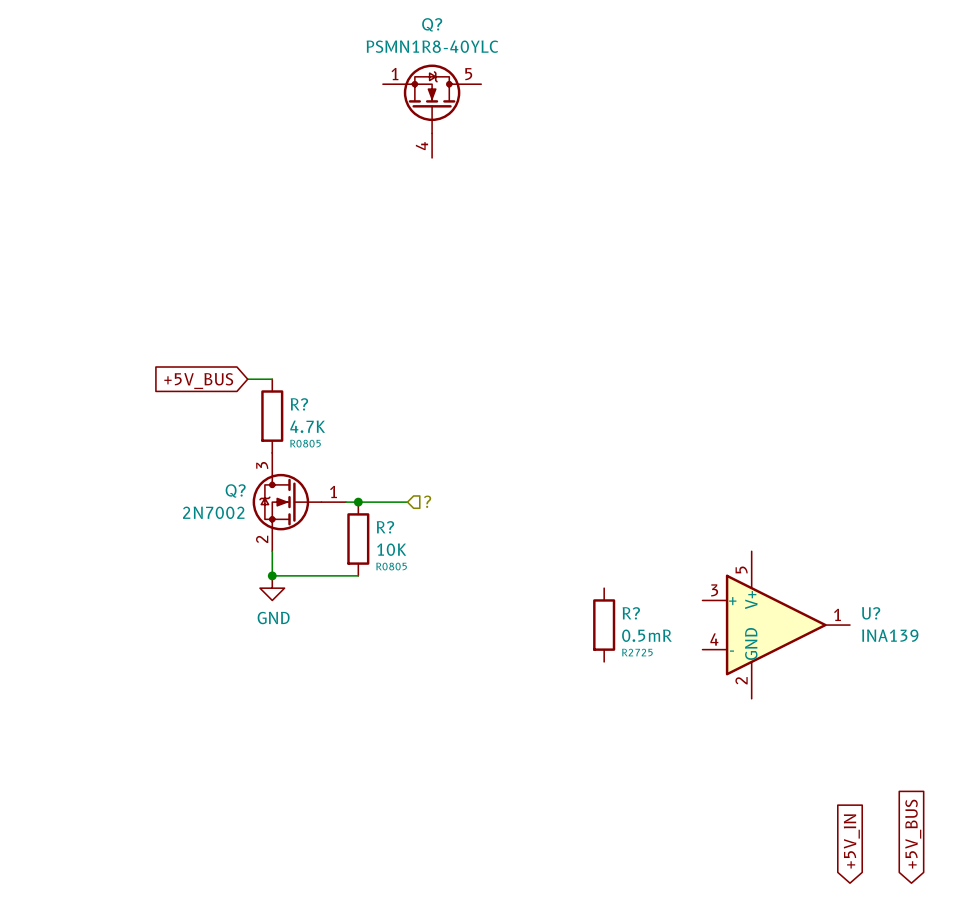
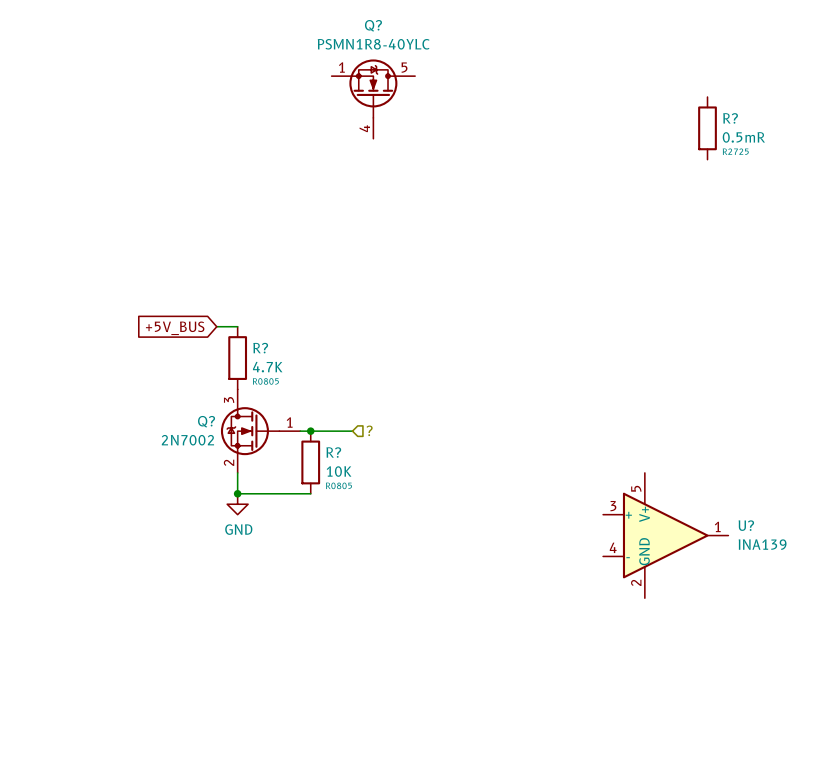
R?: none -> 0.5mR (707, 128)
R?: 0.5mR (604, 625) -> none
global label: +5V_BUS (913, 834) -> none
global label: +5V_IN (851, 841) -> none

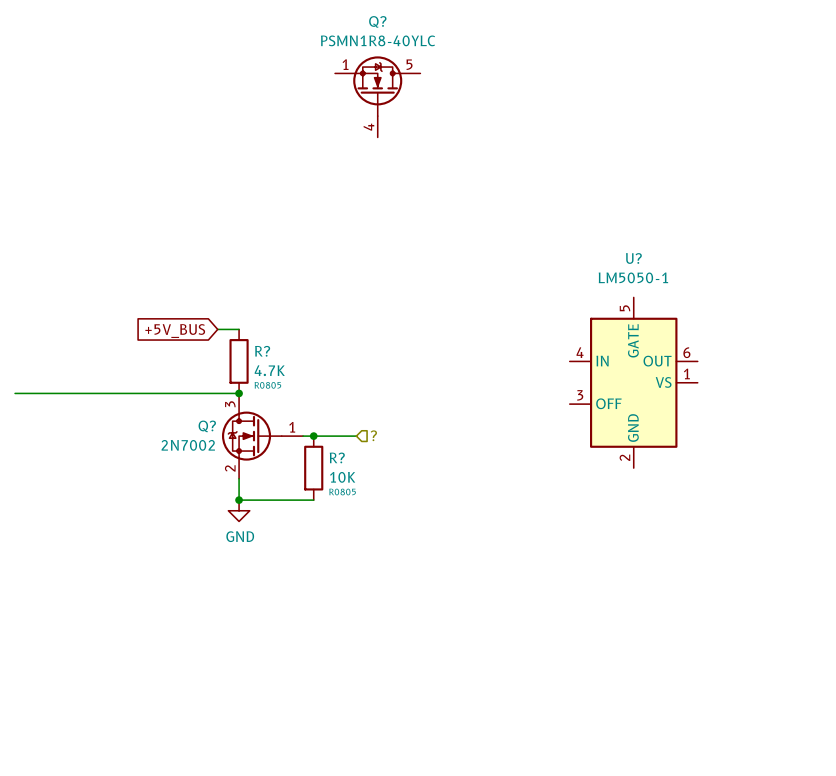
R?: 0.5mR (707, 128) -> none
U?: none -> LM5050-1 (633, 382)
wire: none -> (15, 393) (239, 393)
junction: none -> (239, 393)
U?: INA139 (665, 535) -> none

